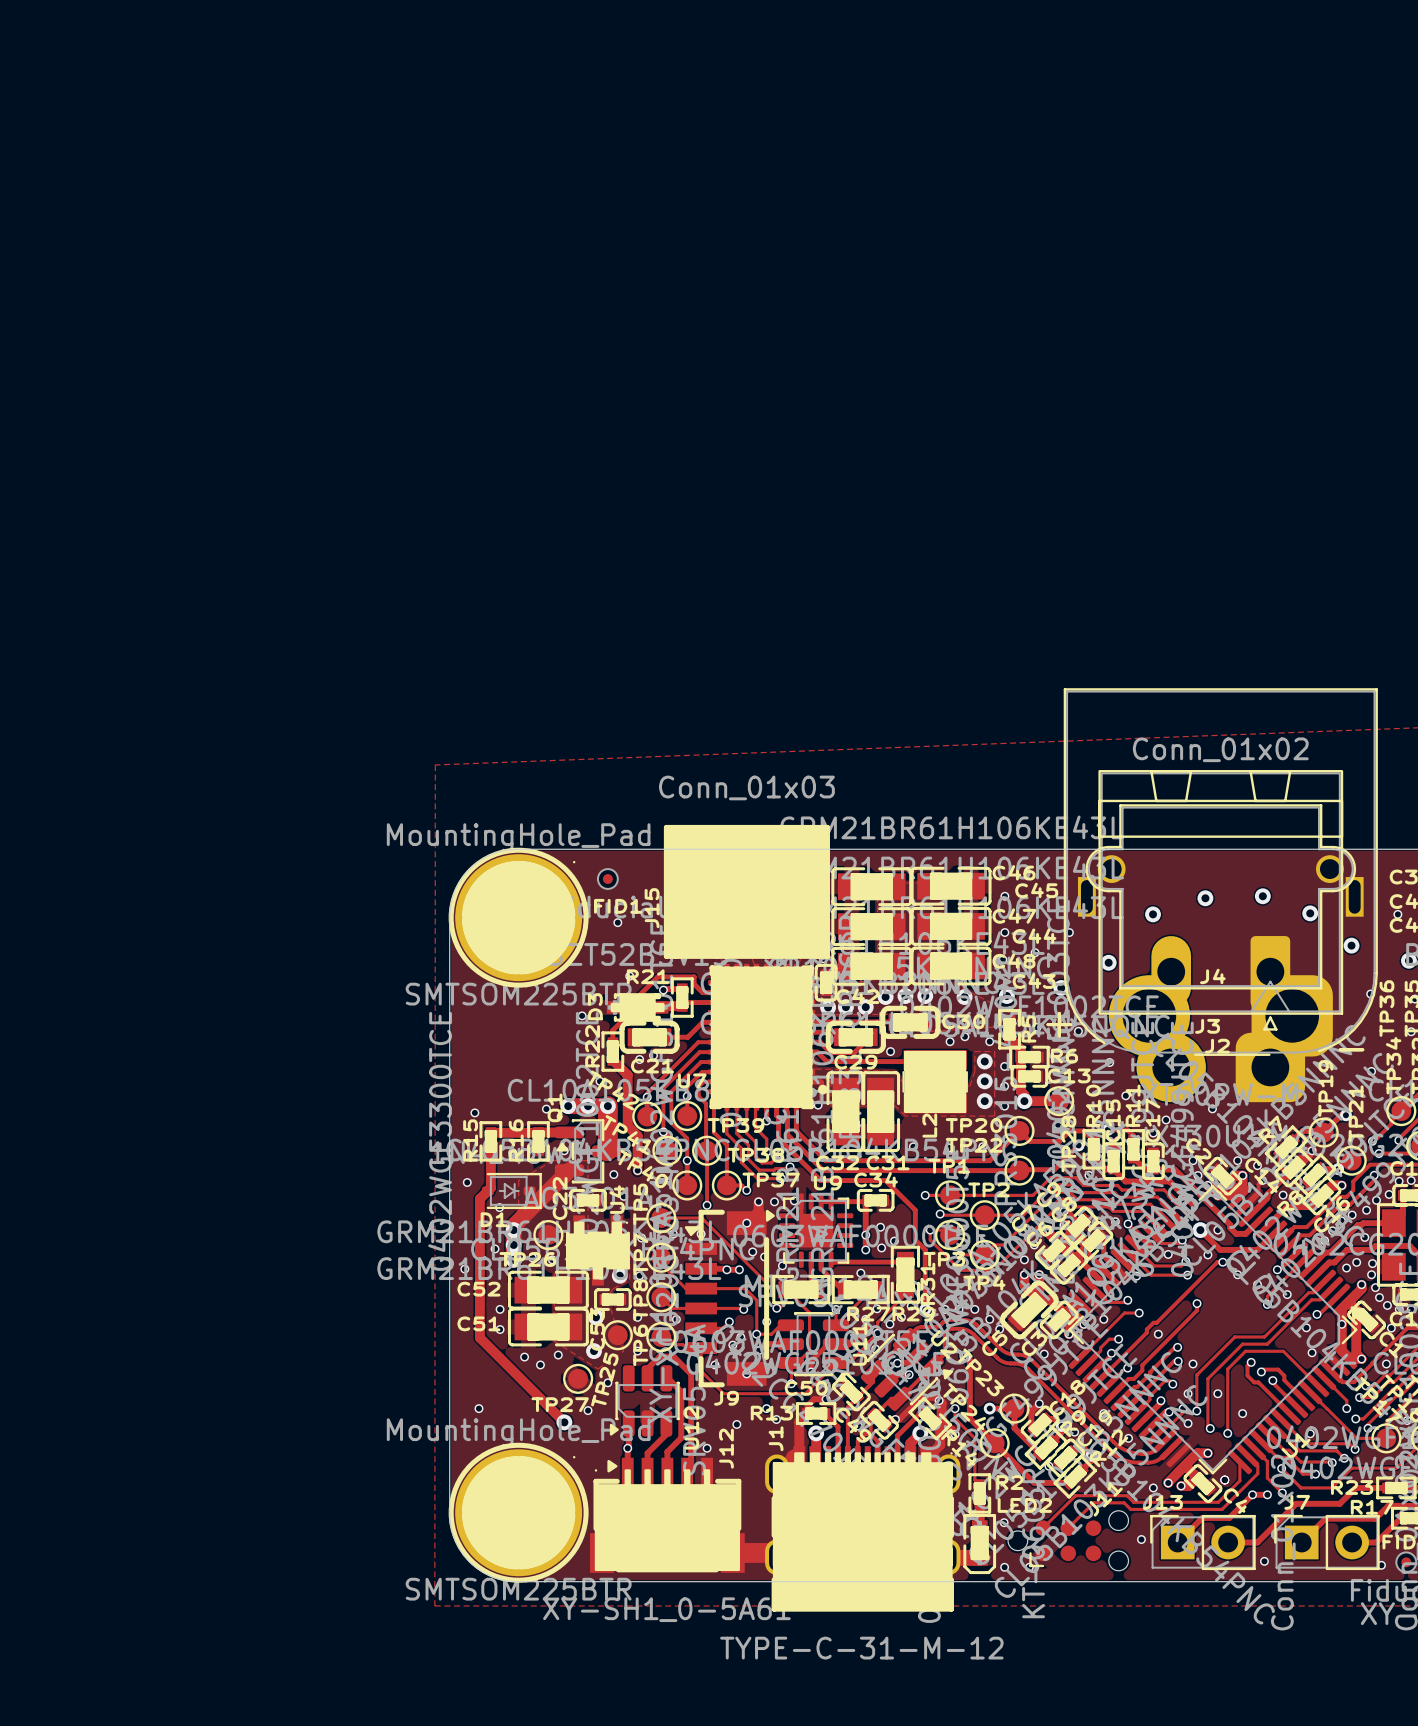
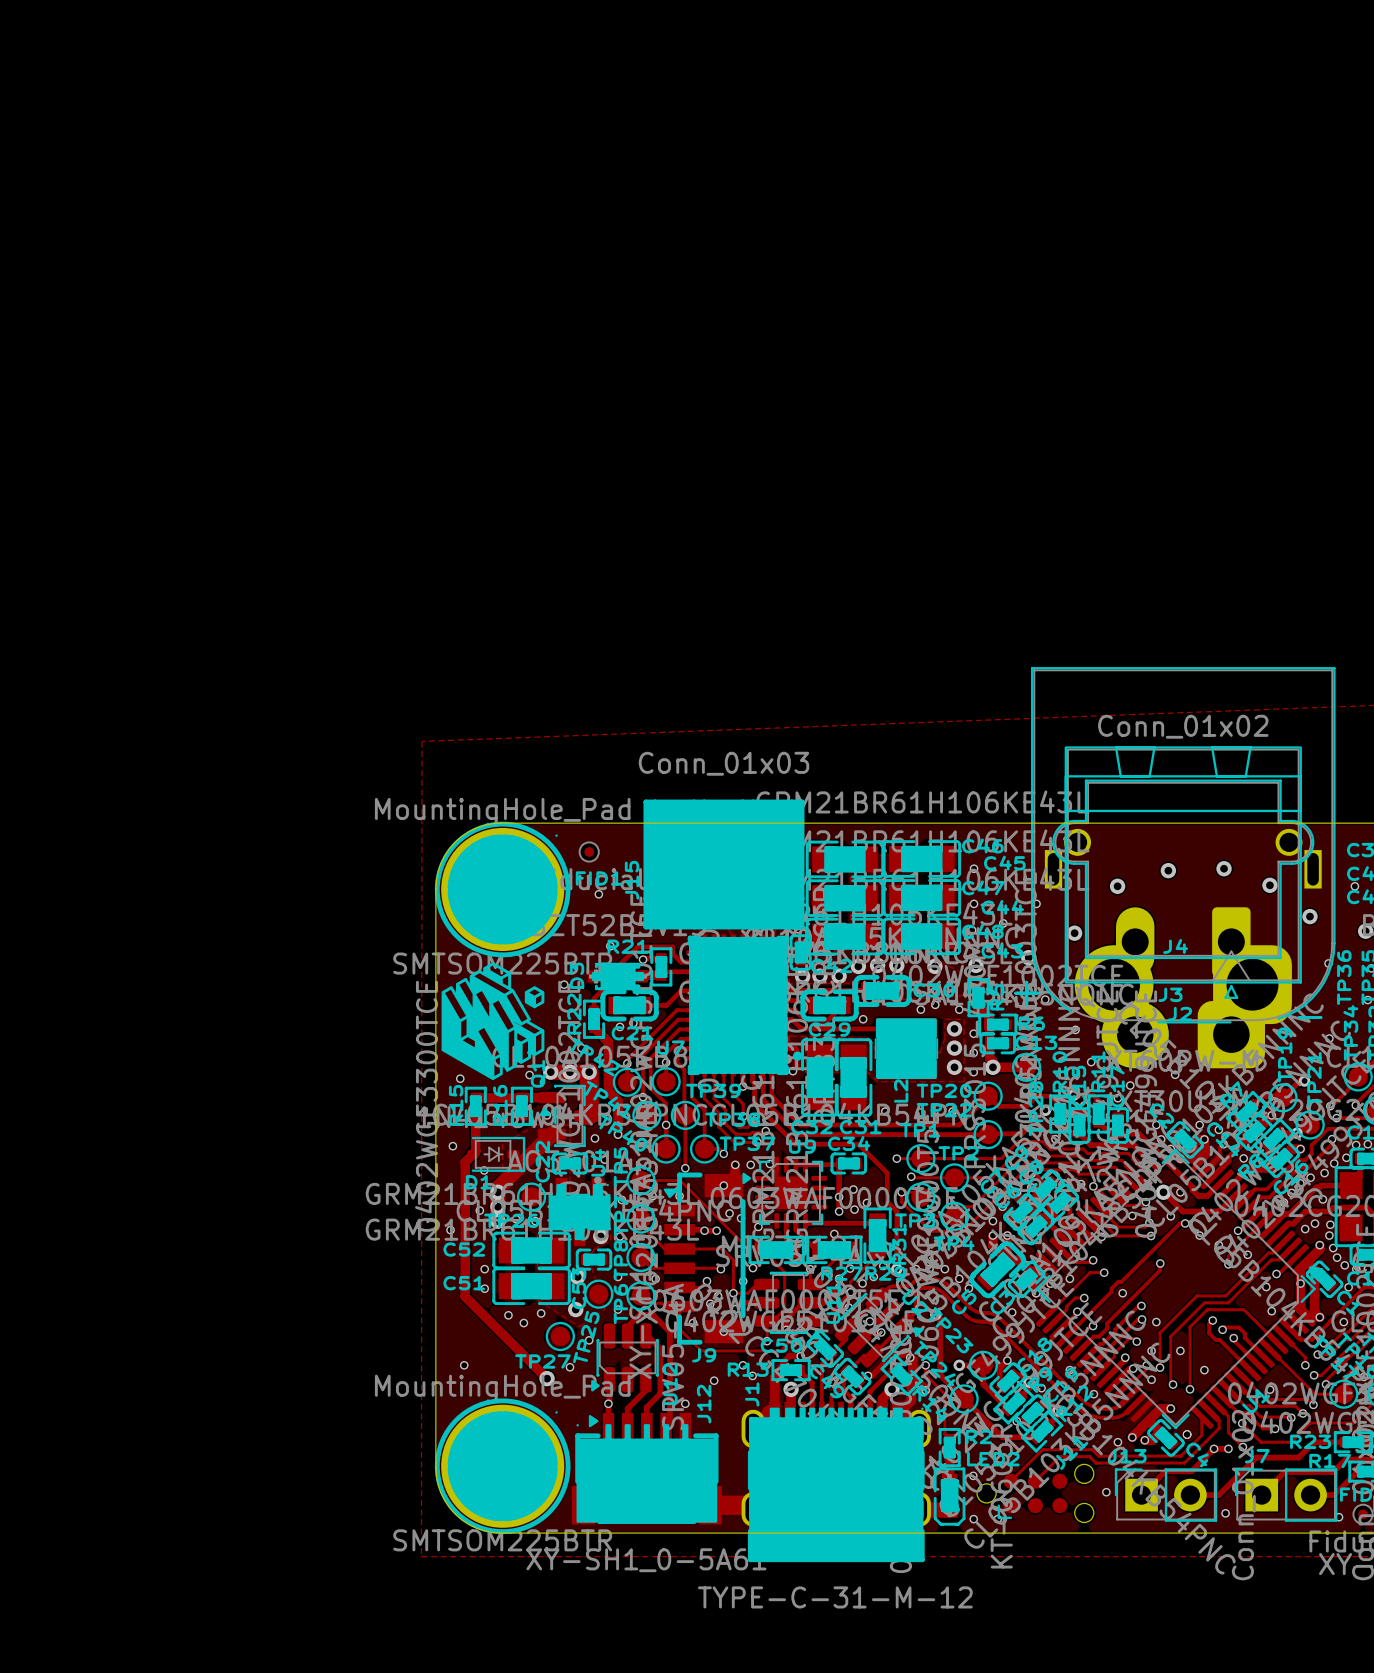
drawing: none -> [441, 962, 545, 1081]

